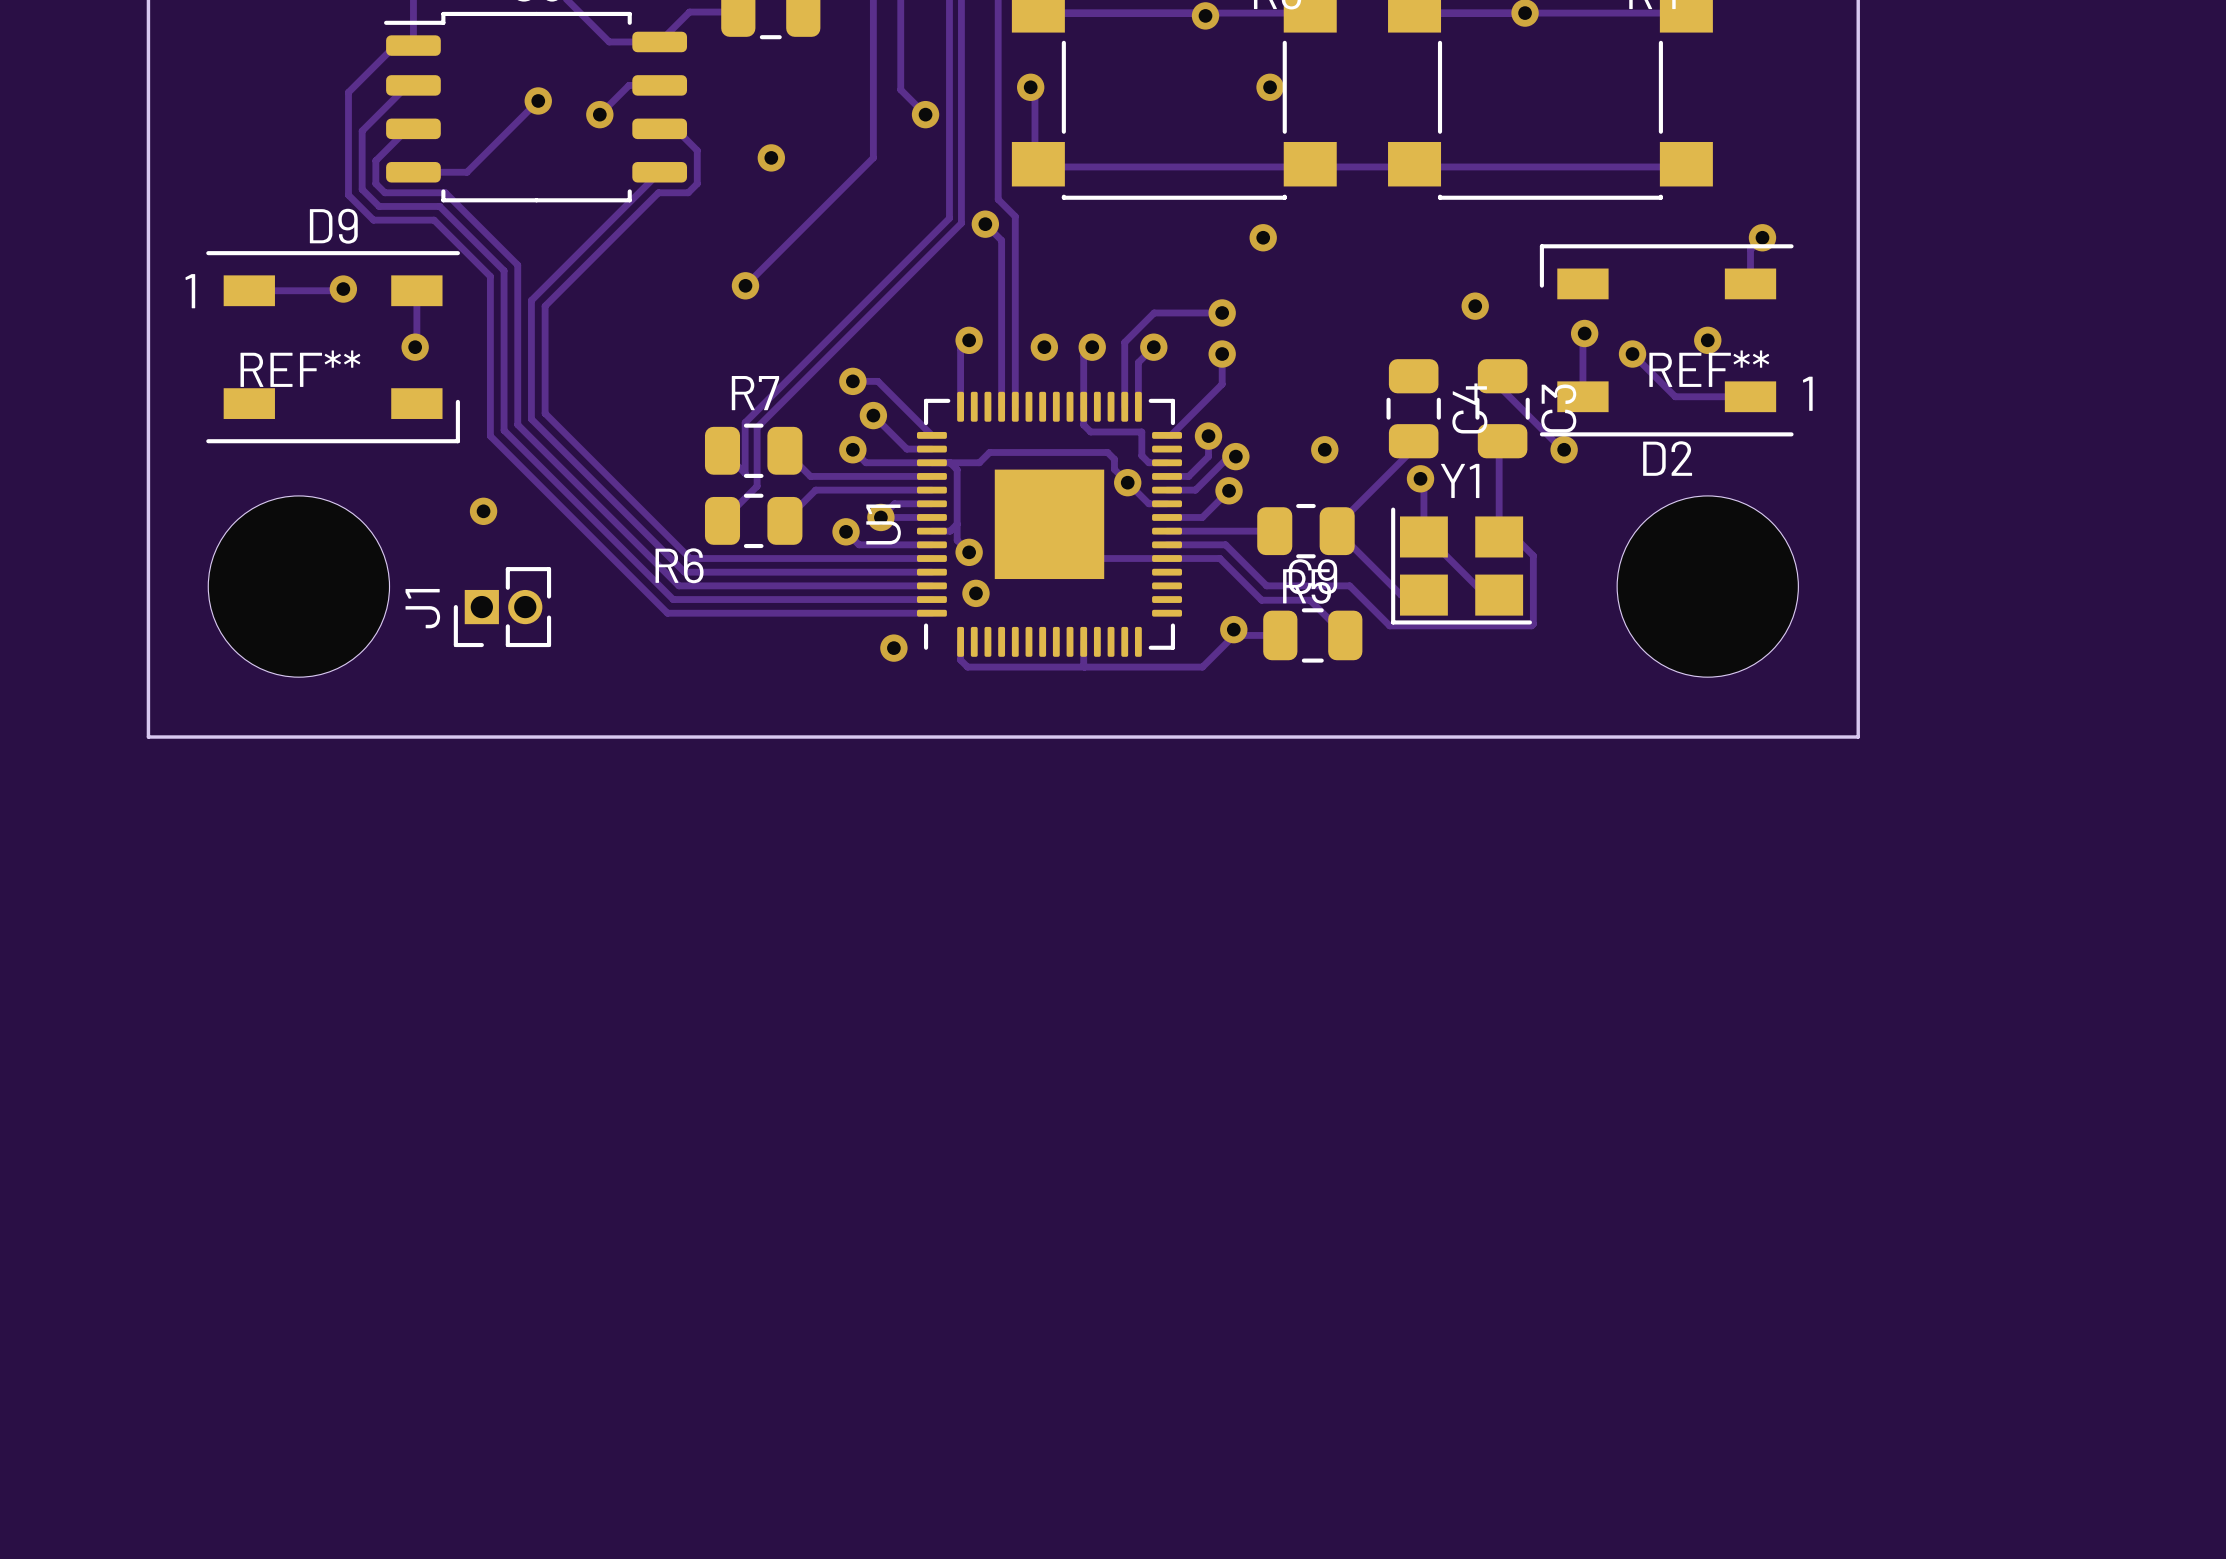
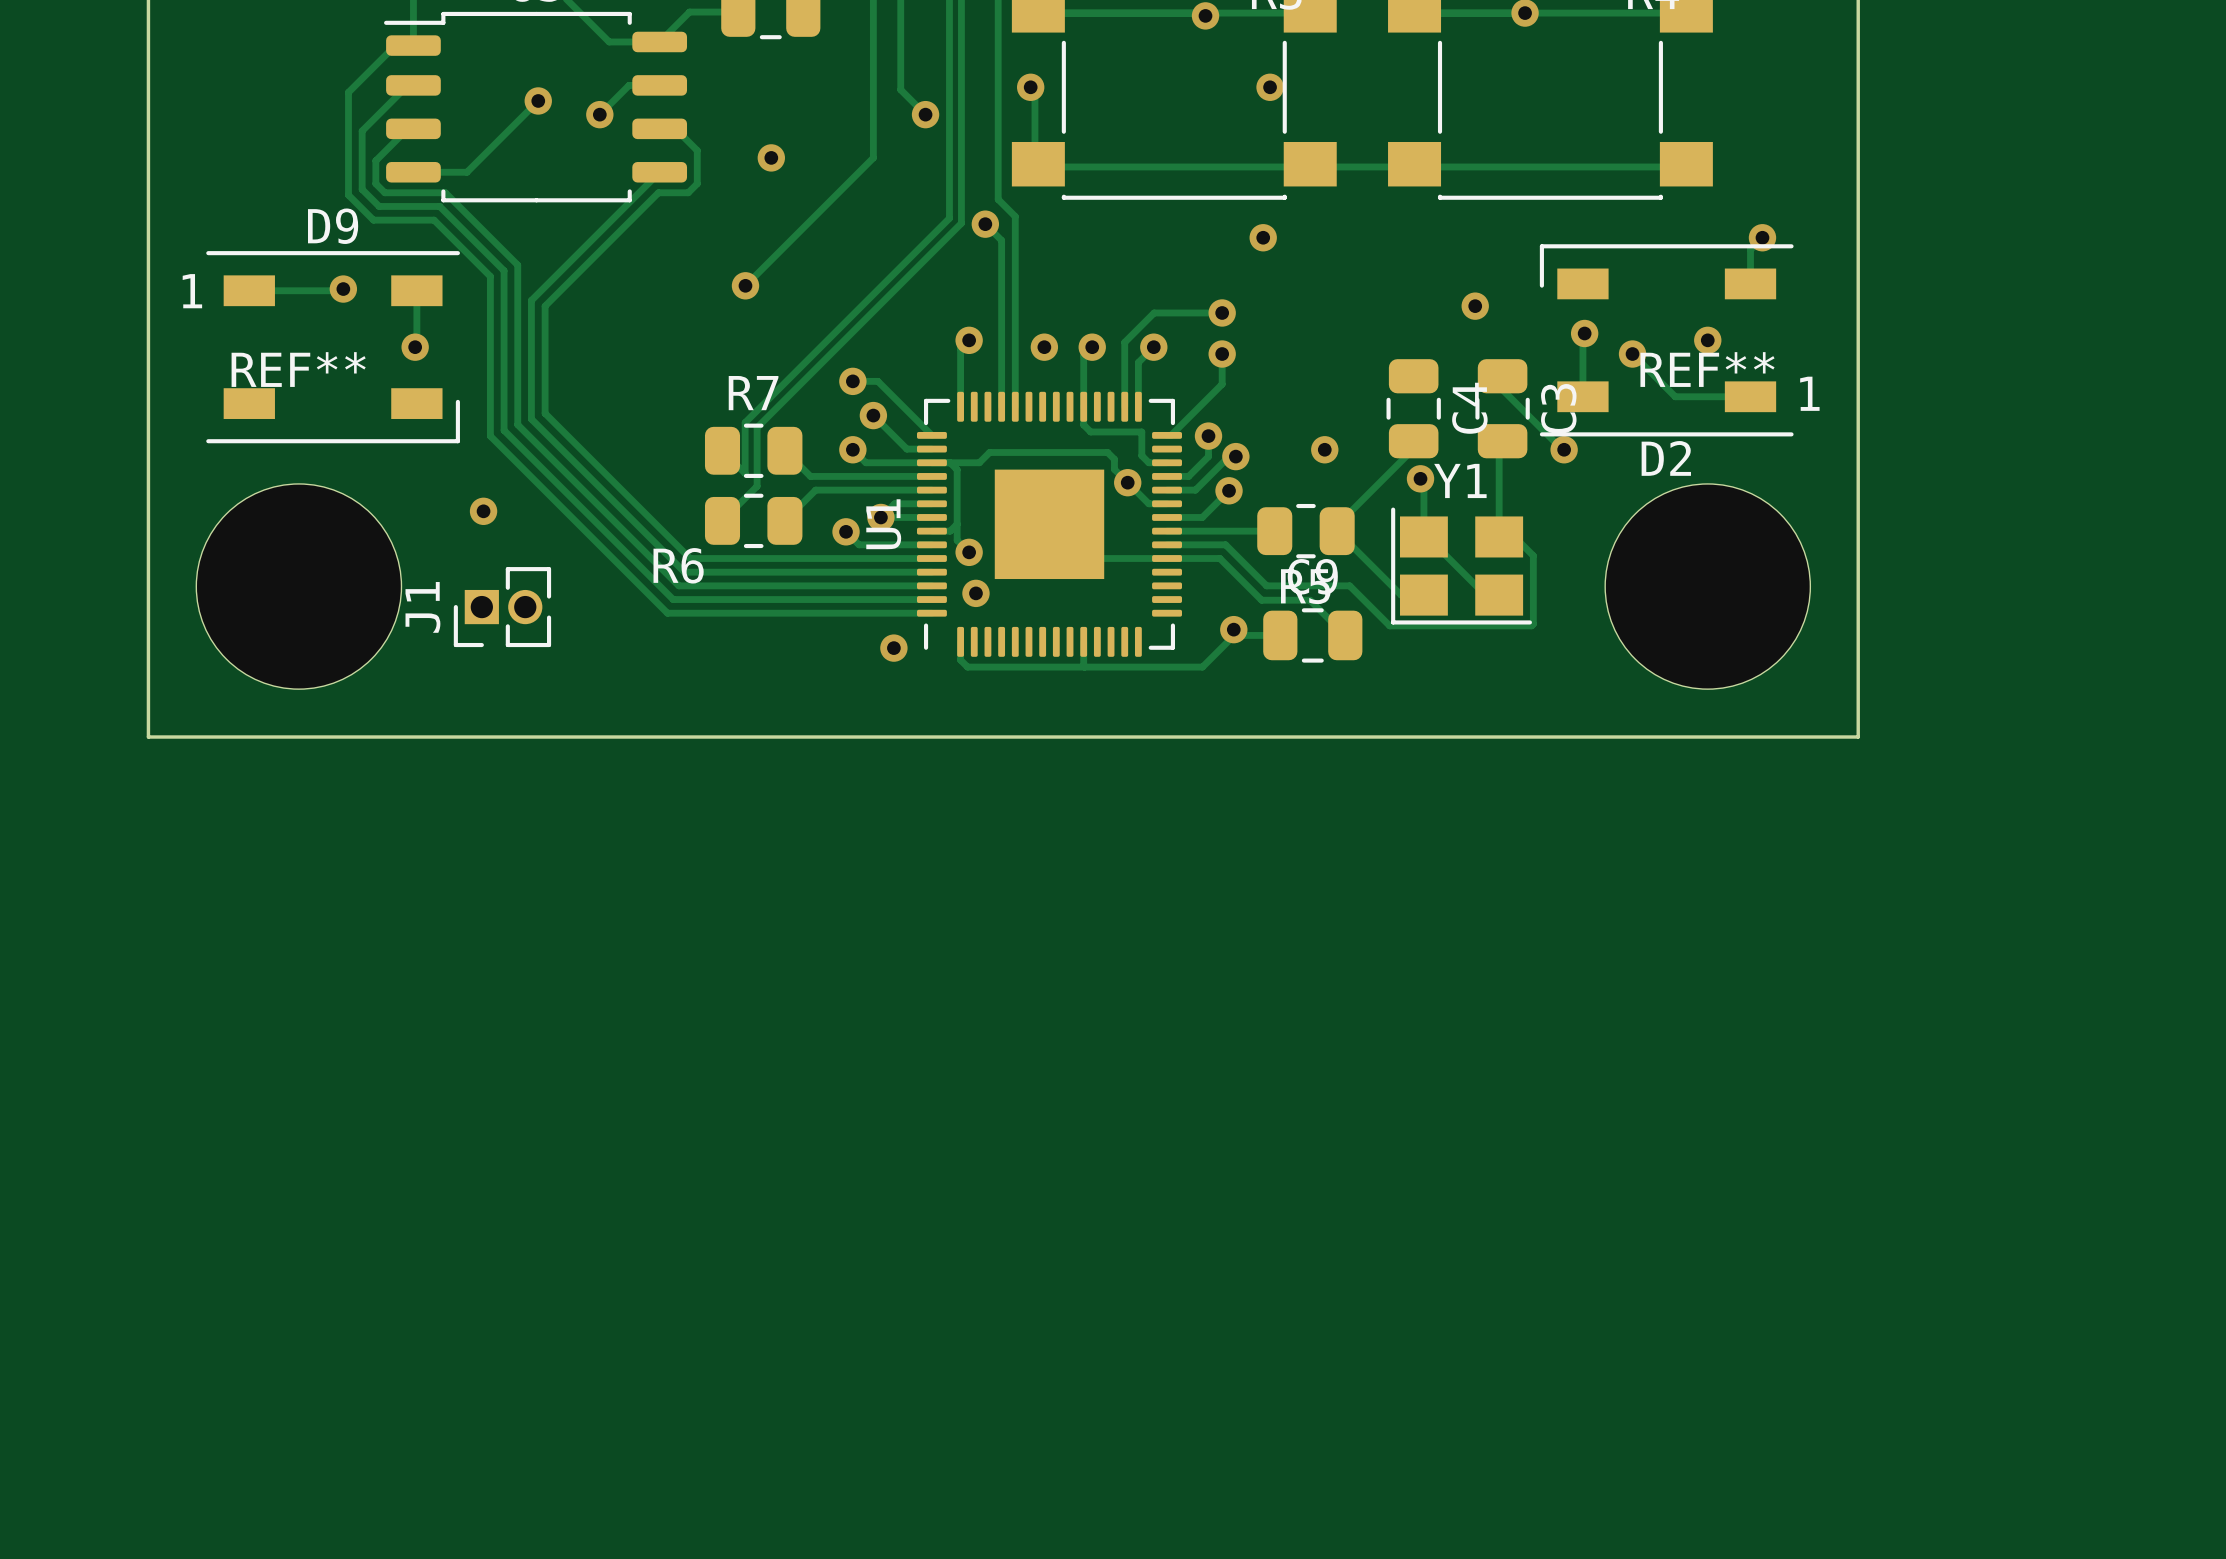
REF** footprint: [208, 495, 390, 678] -> [196, 483, 402, 690]
REF** footprint: [1617, 495, 1799, 678] -> [1605, 483, 1811, 690]

